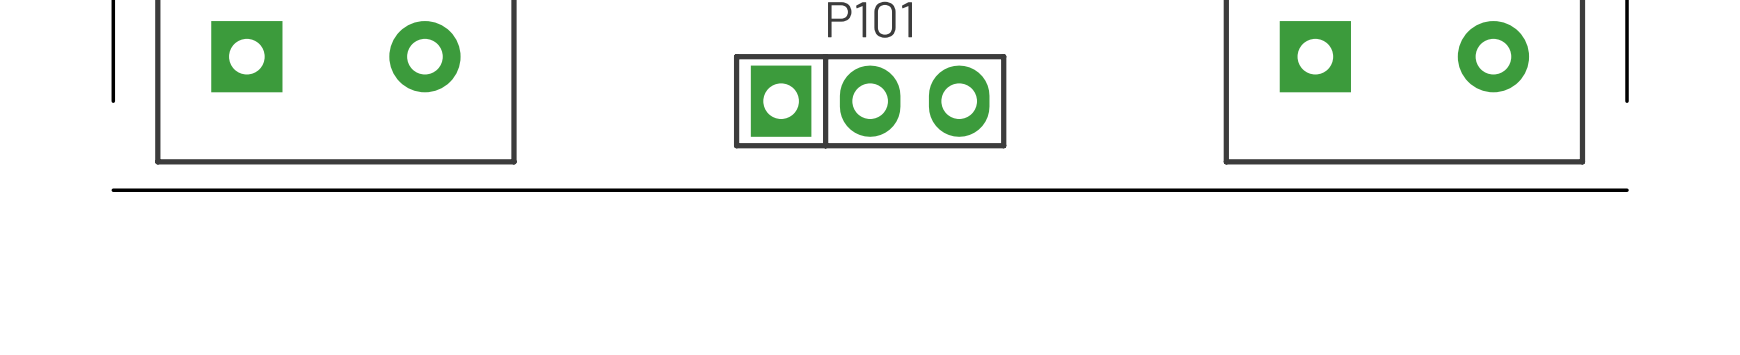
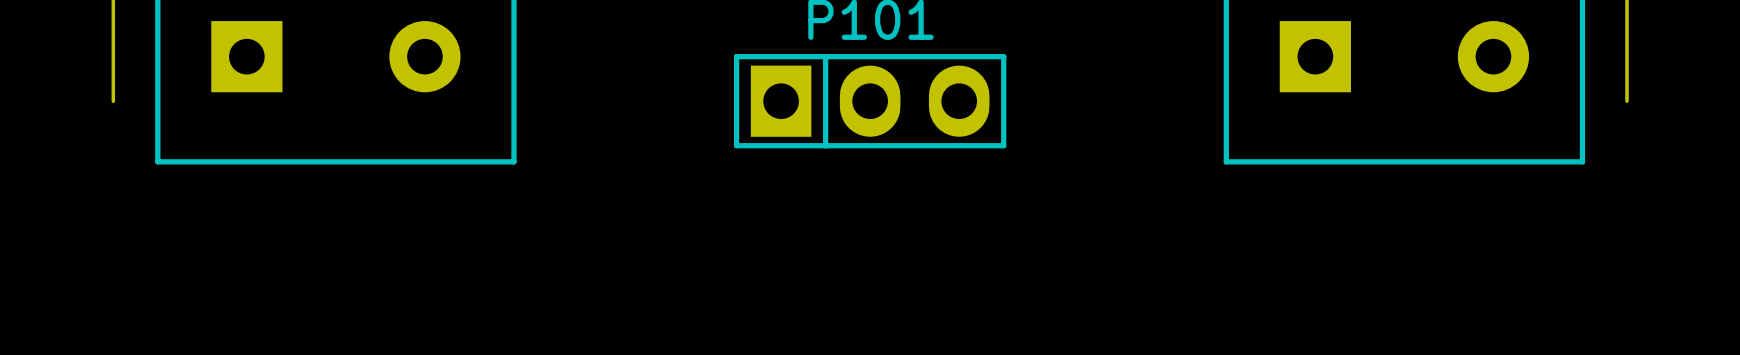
board edge: (113, 190) (1627, 190) -> none

